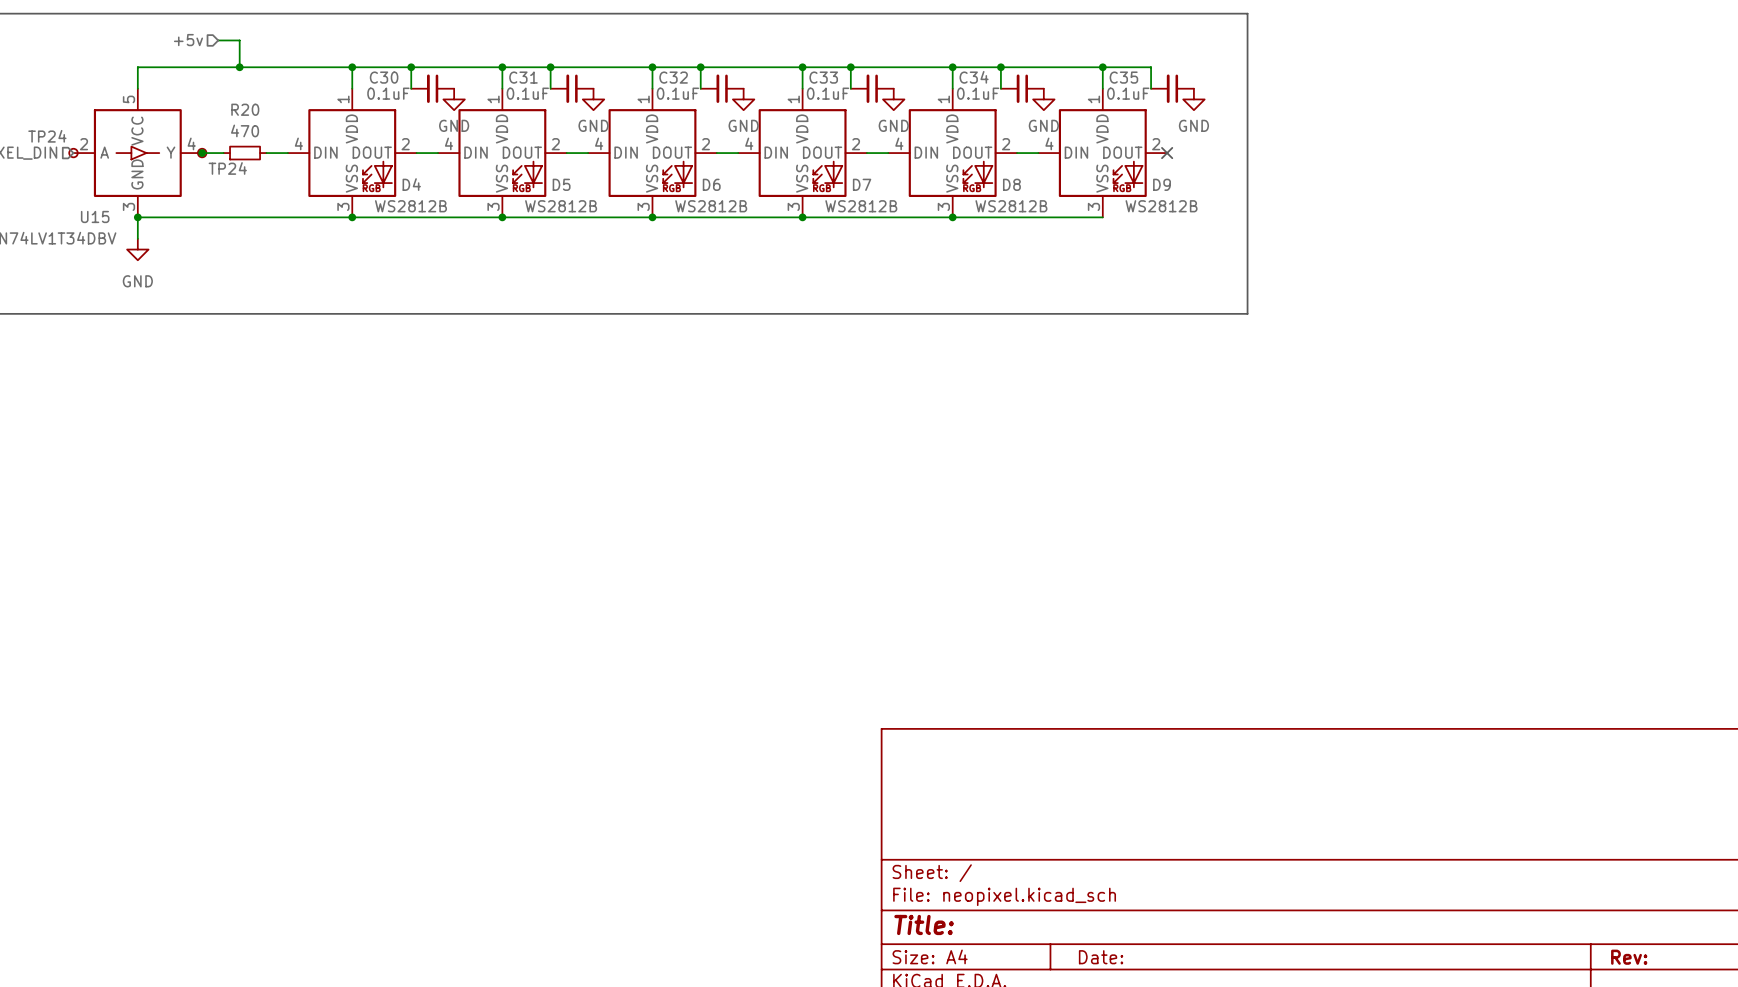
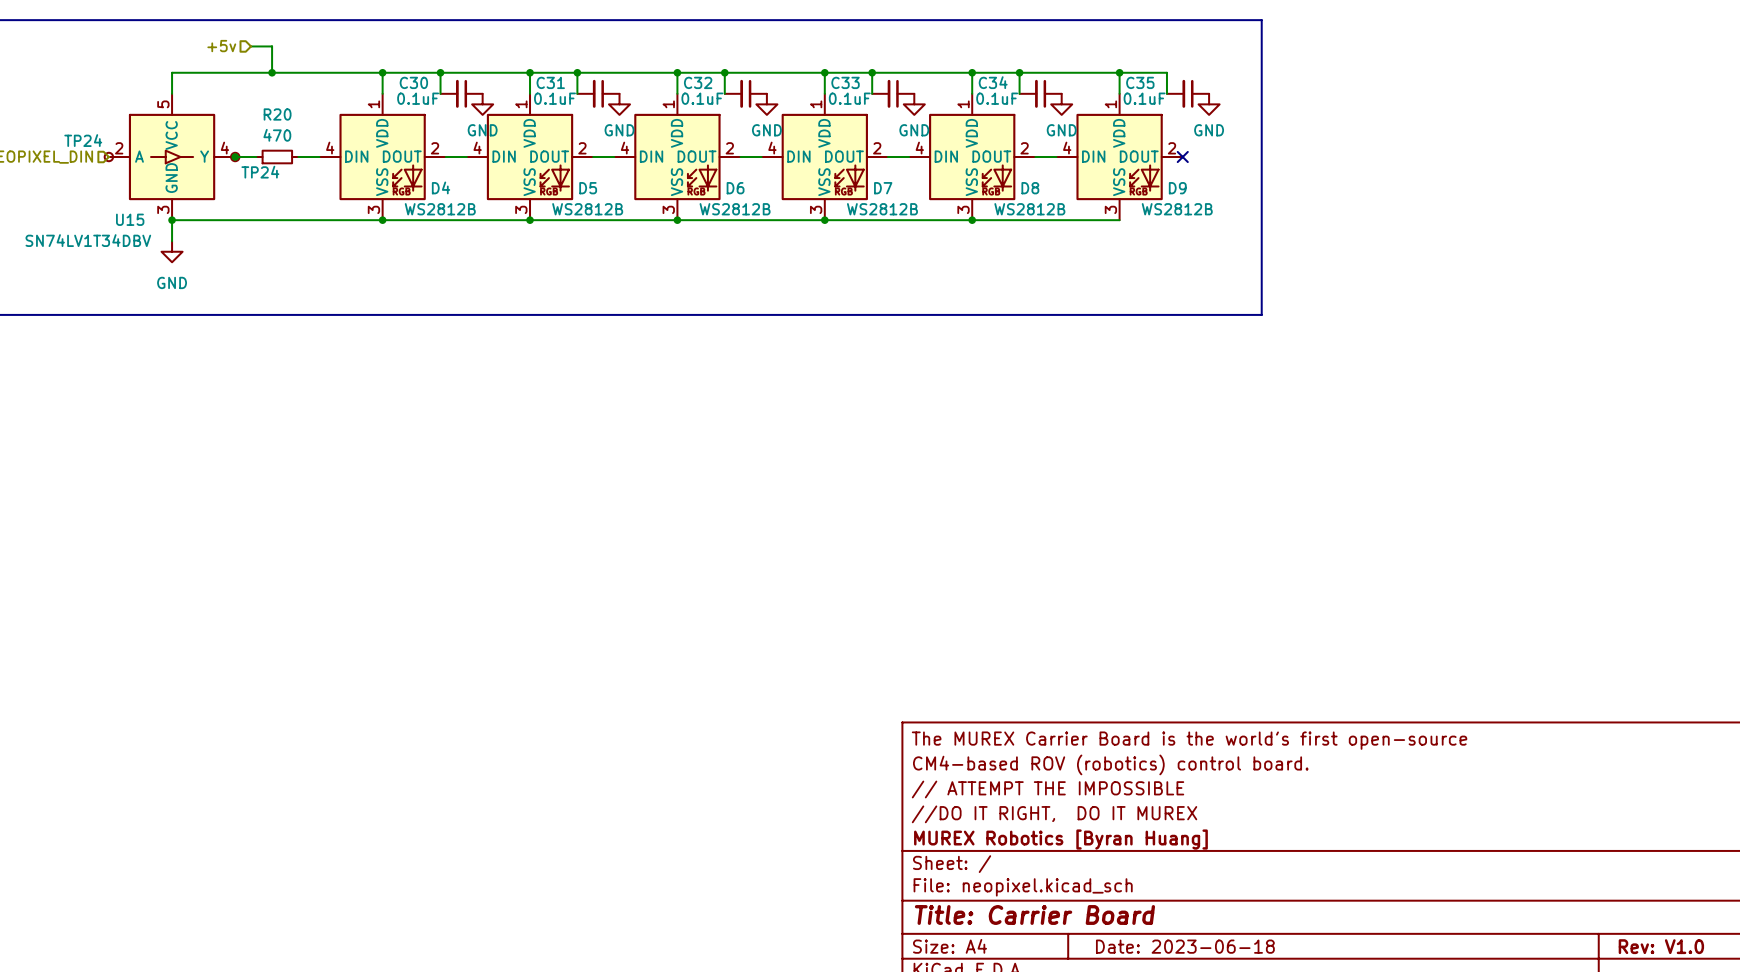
title block: none -> The MUREX Carrier Board is the world's first open-source (1189, 740)
title block: none -> CM4-based ROV (robotics) control board. (1110, 764)
title block: none -> // ATTEMPT THE IMPOSSIBLE (1048, 789)
title block: none -> //DO IT RIGHT, DO IT MUREX (1054, 814)
title block: none -> MUREX Robotics [Byran Huang] (1060, 839)
title block: Title: (924, 924) -> Title: Carrier Board (1034, 914)
title block: Date: (1101, 957) -> Date: 2023-06-18 (1185, 946)
title block: Rev: (1629, 957) -> Rev: V1.0 (1661, 946)

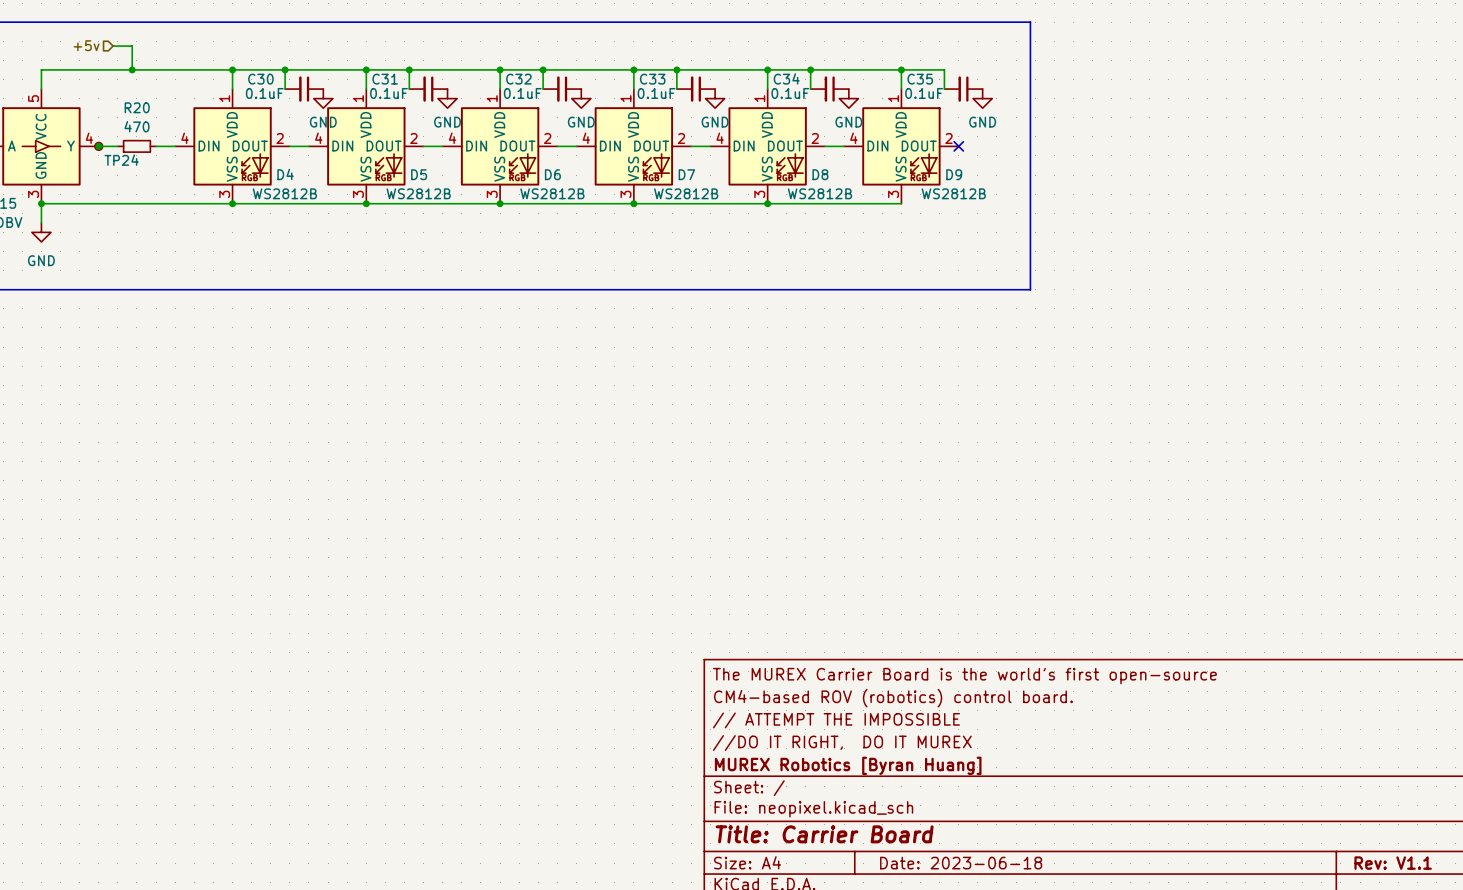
title block: Rev: V1.0 (1661, 946) -> Rev: V1.1 (1393, 863)

